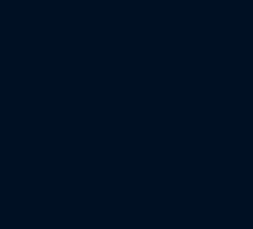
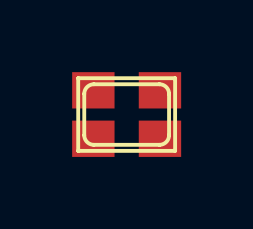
part: none -> (126, 114)

